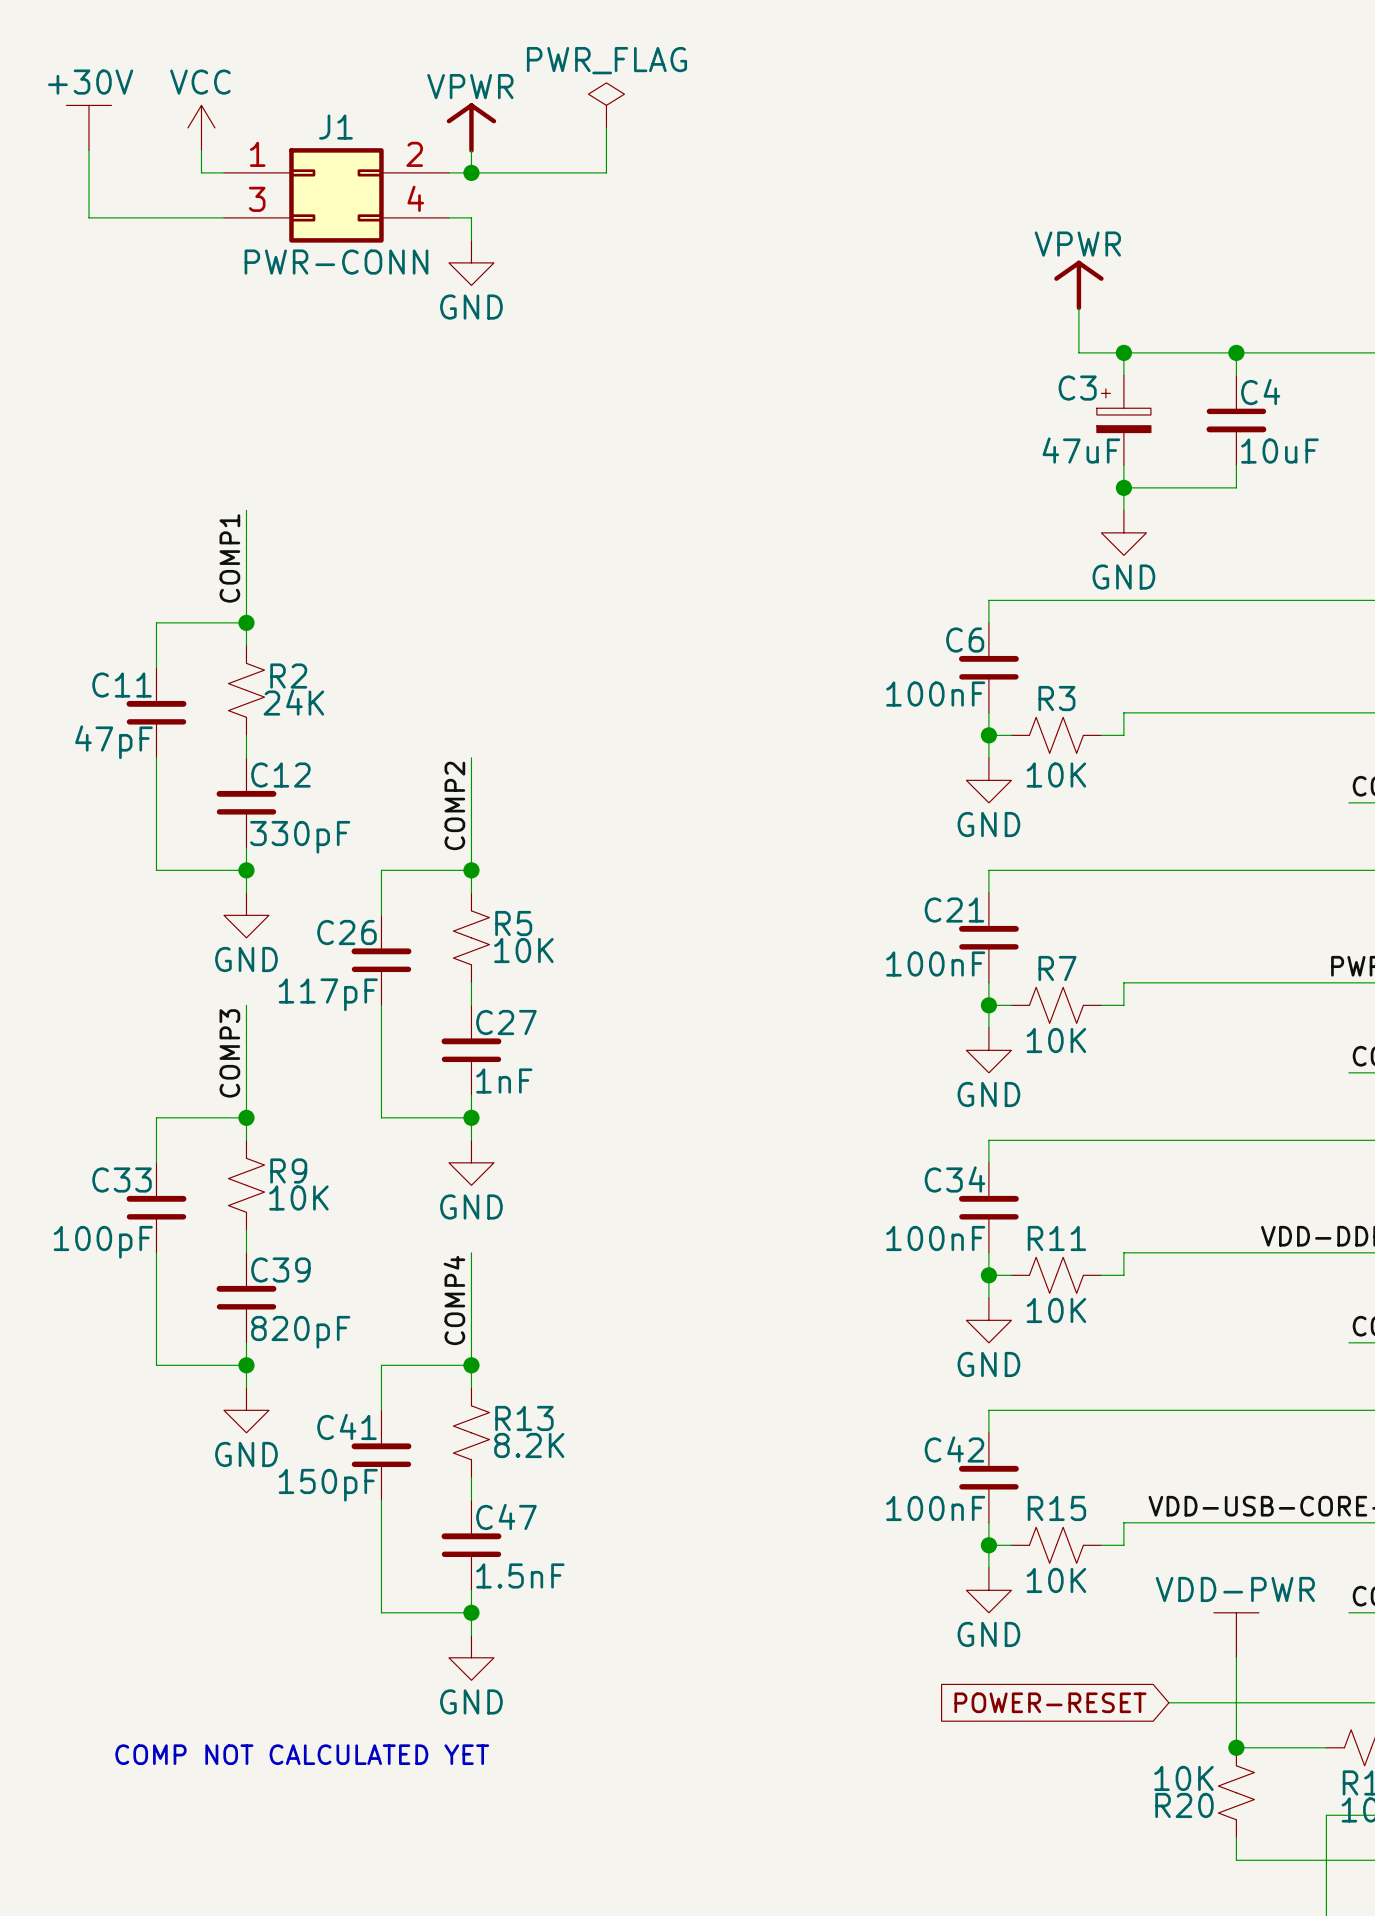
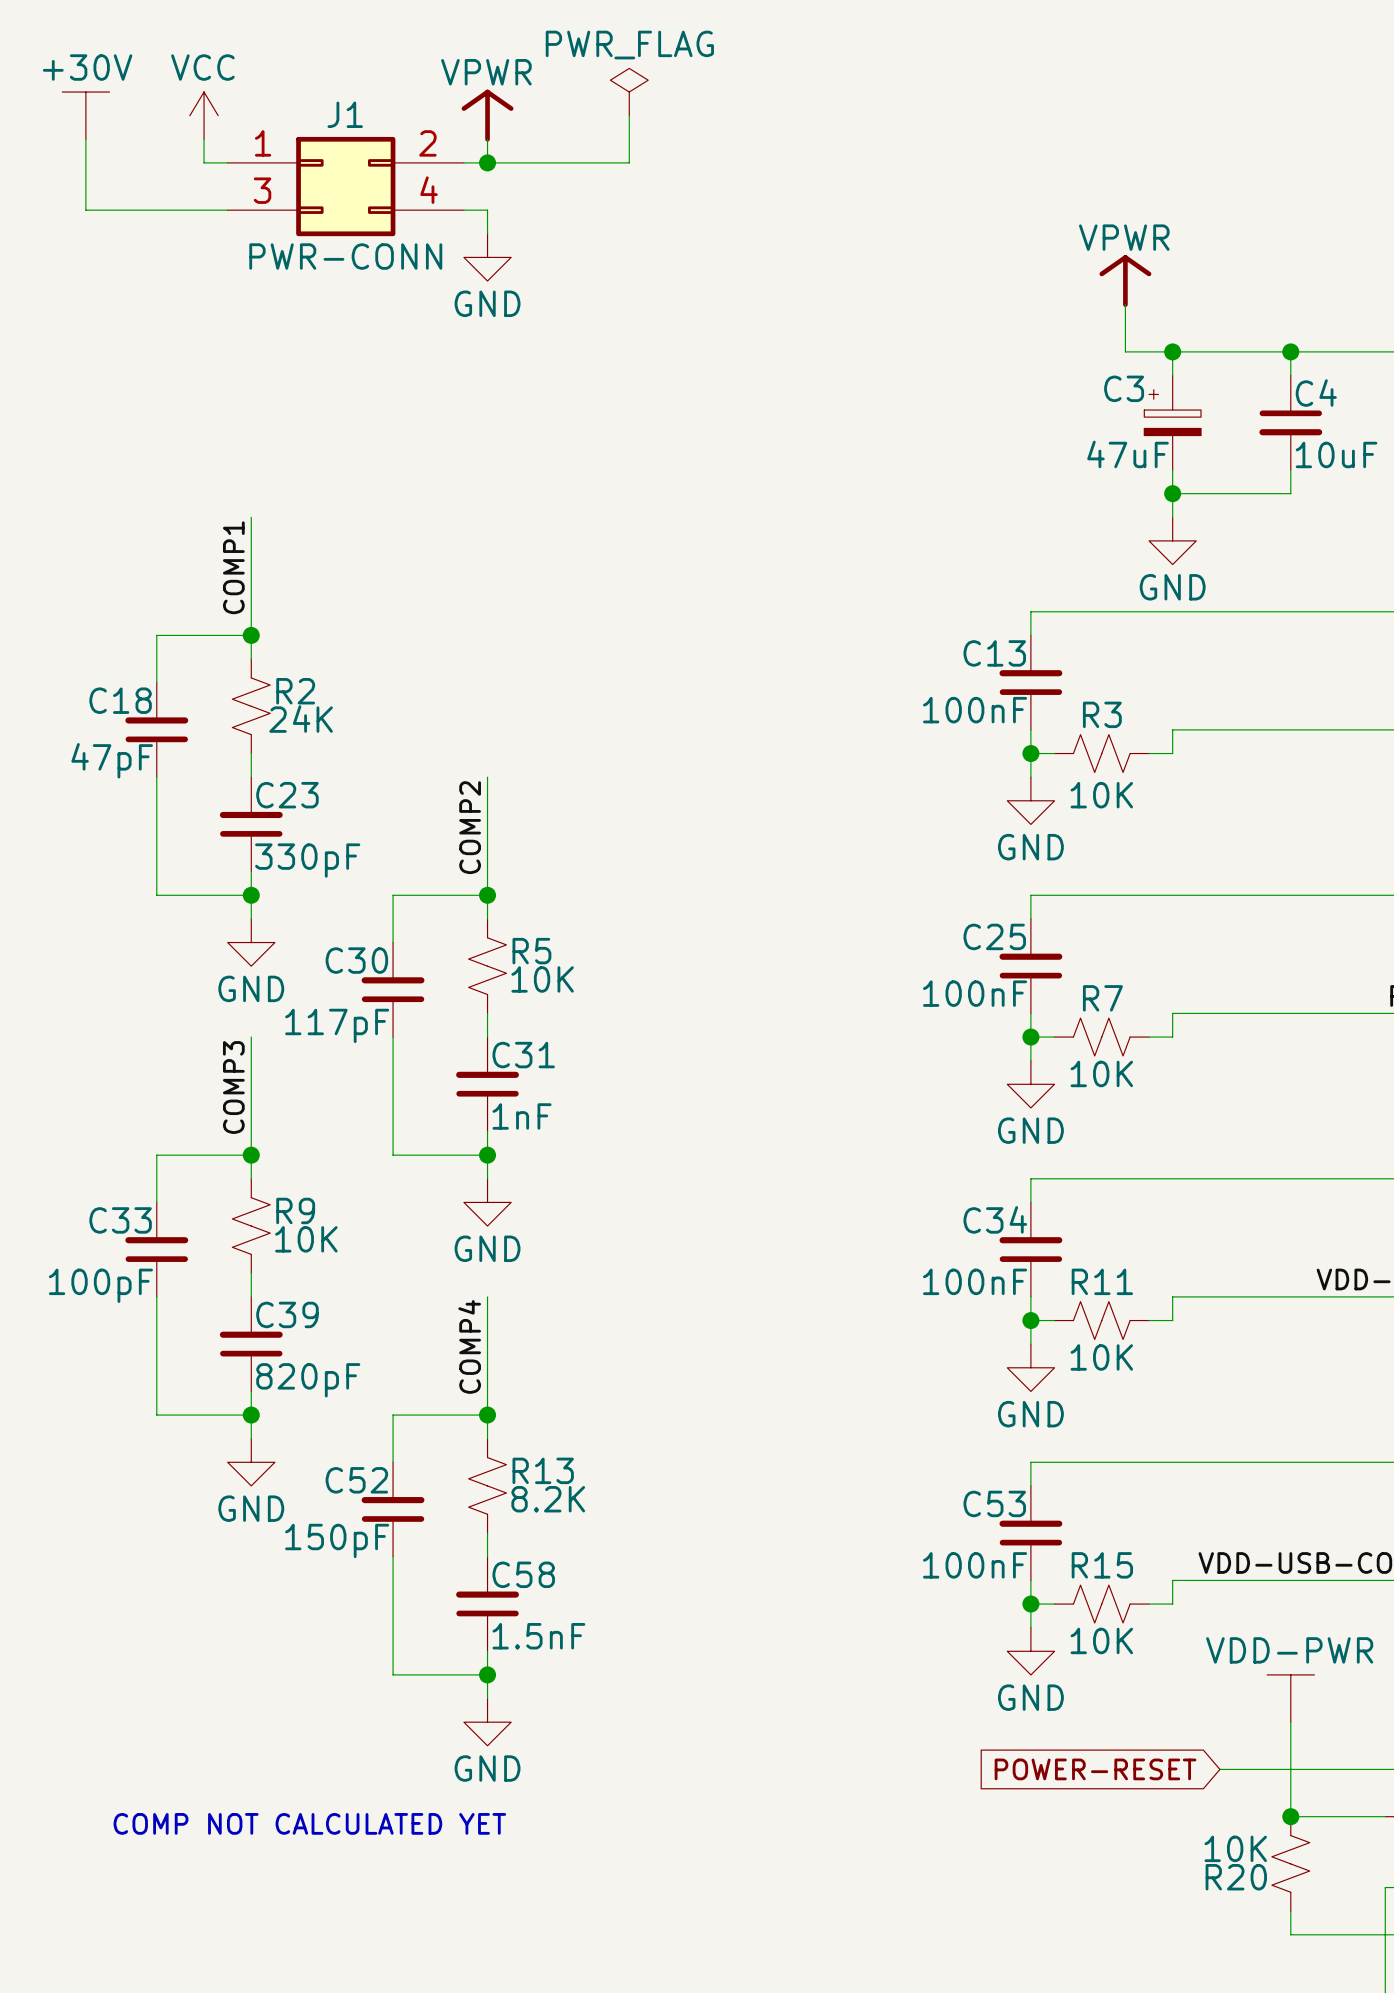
C6 name: C6 (965, 640) -> C13 (994, 653)
C11 name: C11 (122, 685) -> C18 (120, 700)
C12 name: C12 (280, 775) -> C23 (287, 795)
C21 name: C21 (954, 910) -> C25 (994, 936)
C26 name: C26 (347, 932) -> C30 (356, 960)
C27 name: C27 (506, 1022) -> C31 (523, 1055)
C41 name: C41 (347, 1426) -> C52 (356, 1480)
C42 name: C42 (954, 1449) -> C53 (994, 1503)
C47 name: C47 (506, 1516) -> C58 (523, 1574)

